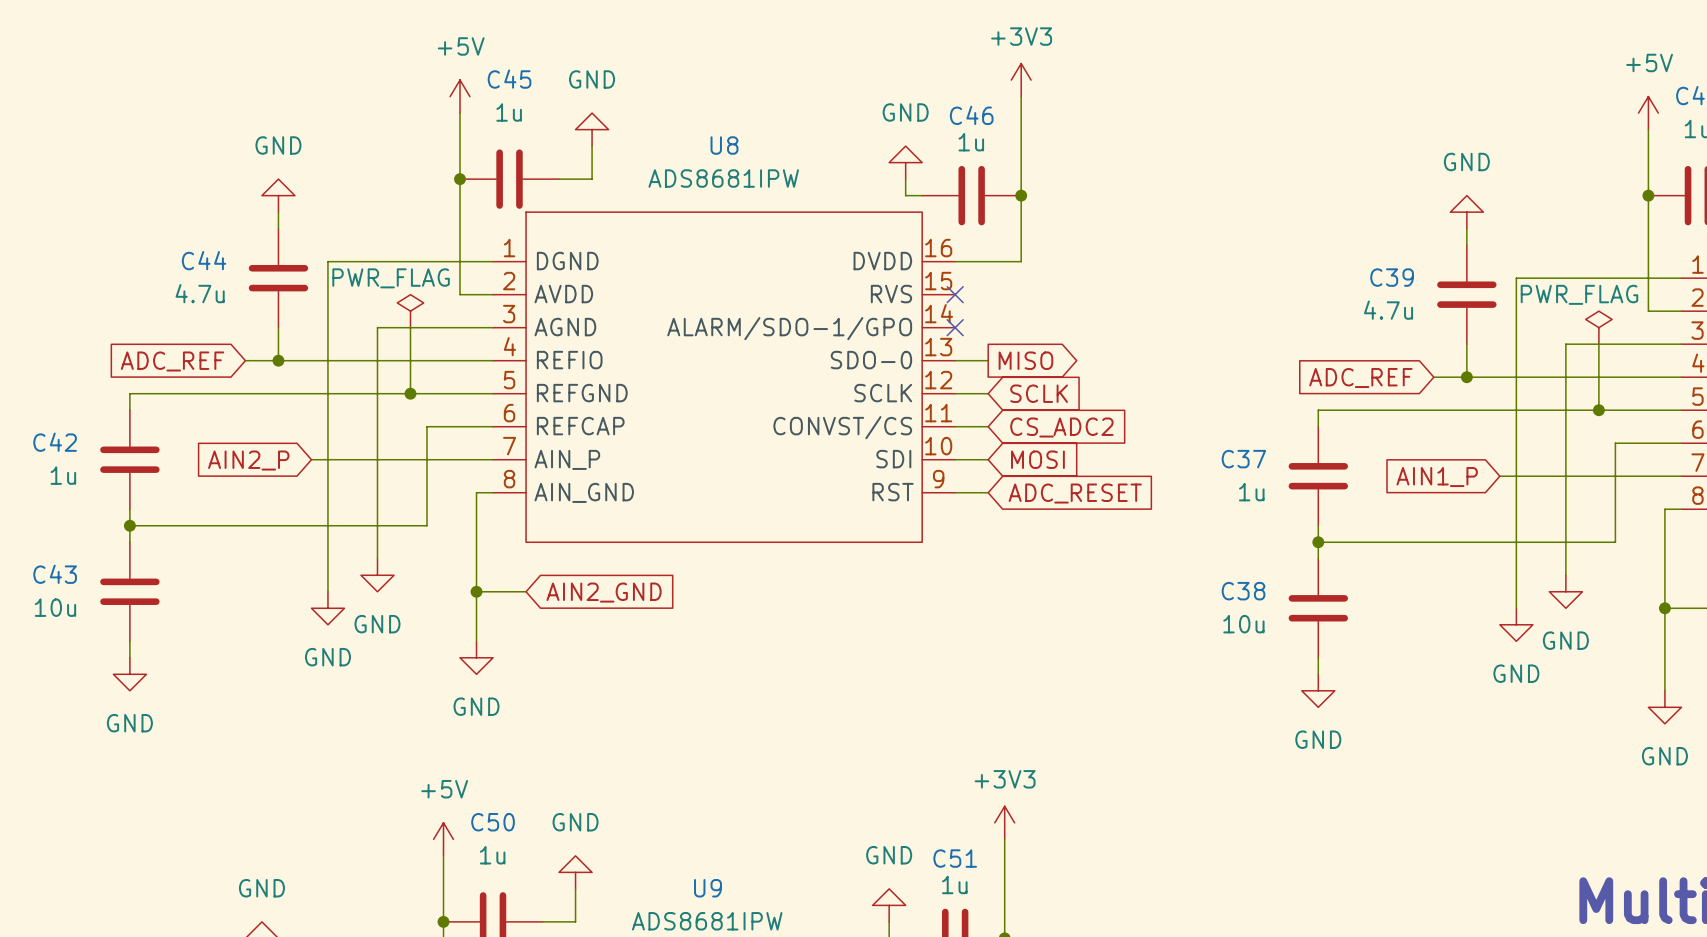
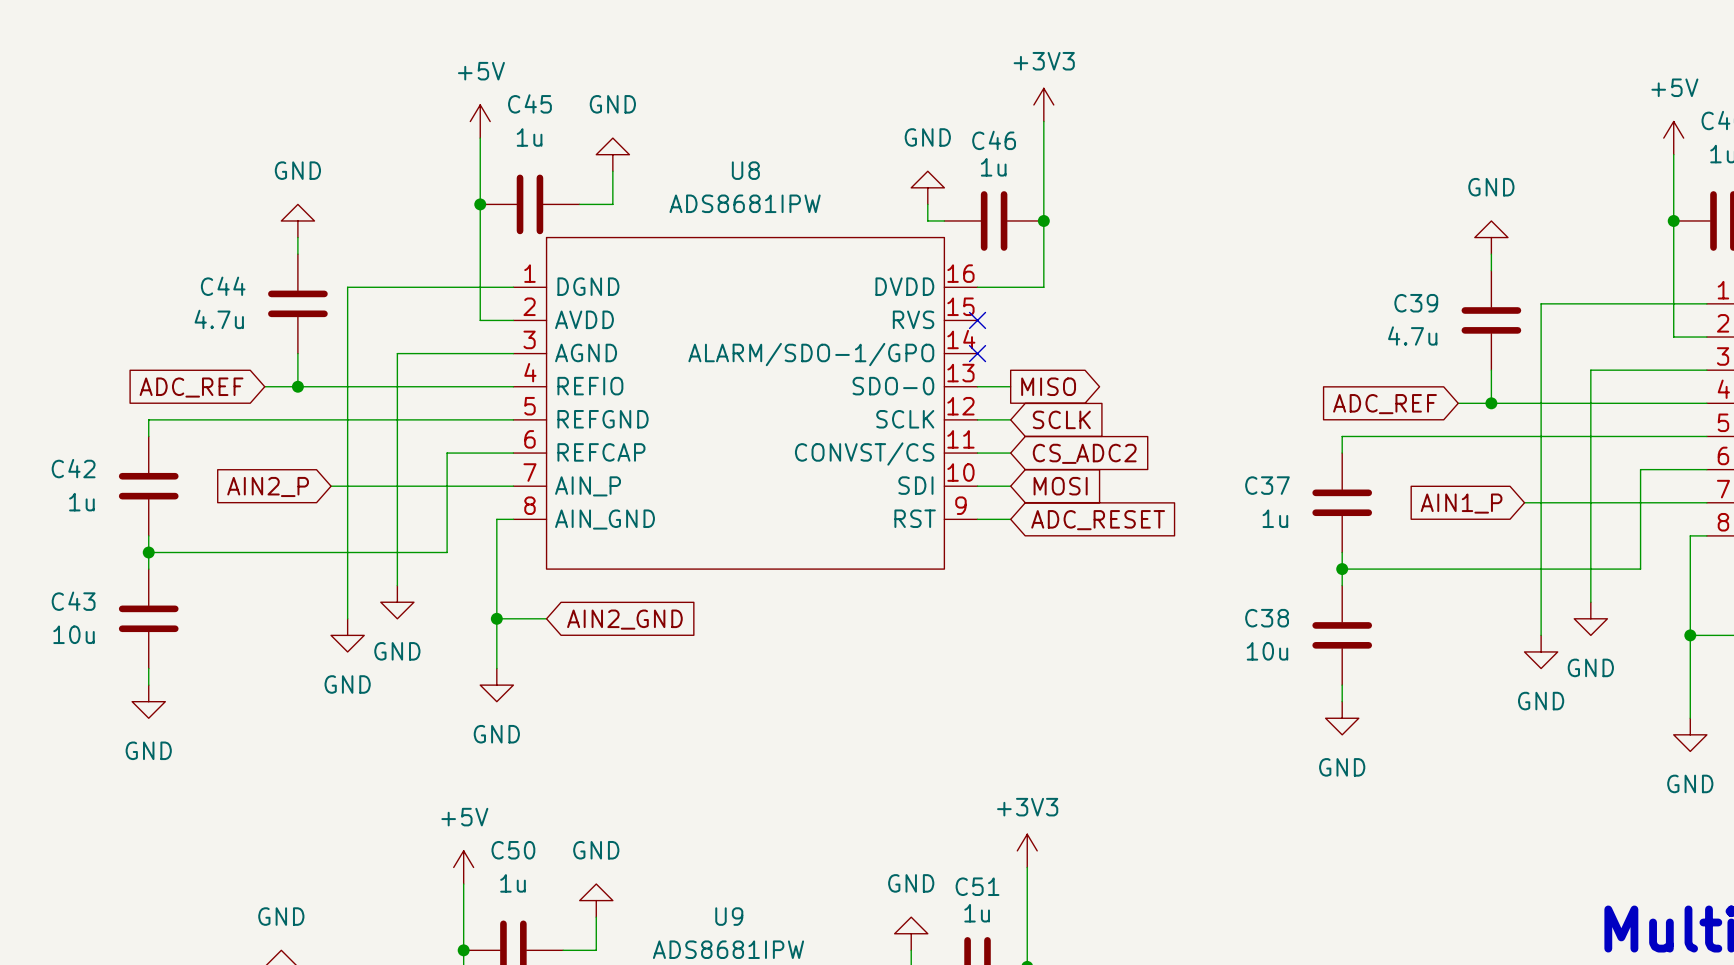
power symbol: PWR_FLAG (410, 311) -> none
wire: (410, 327) (410, 393) -> none
power symbol: PWR_FLAG (1598, 327) -> none
wire: (1598, 344) (1598, 410) -> none
junction: (410, 393) -> none
junction: (1598, 410) -> none

